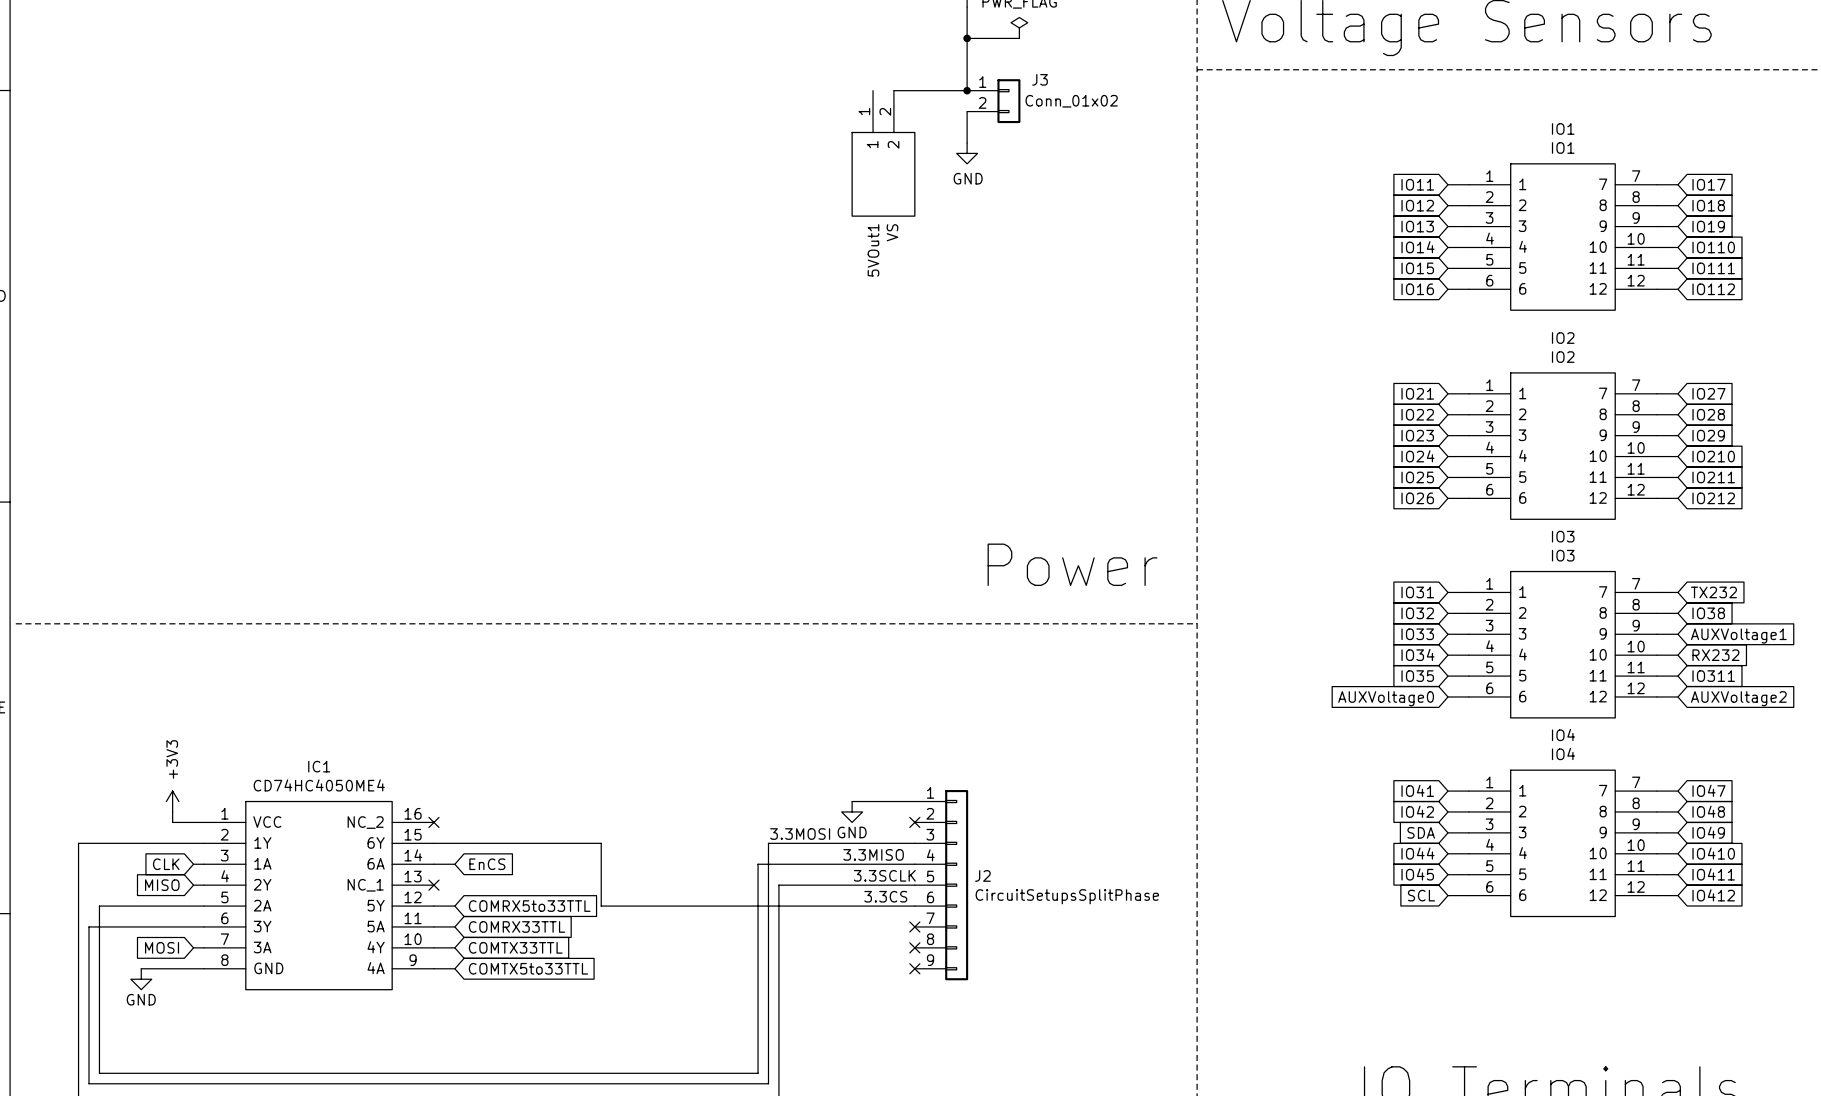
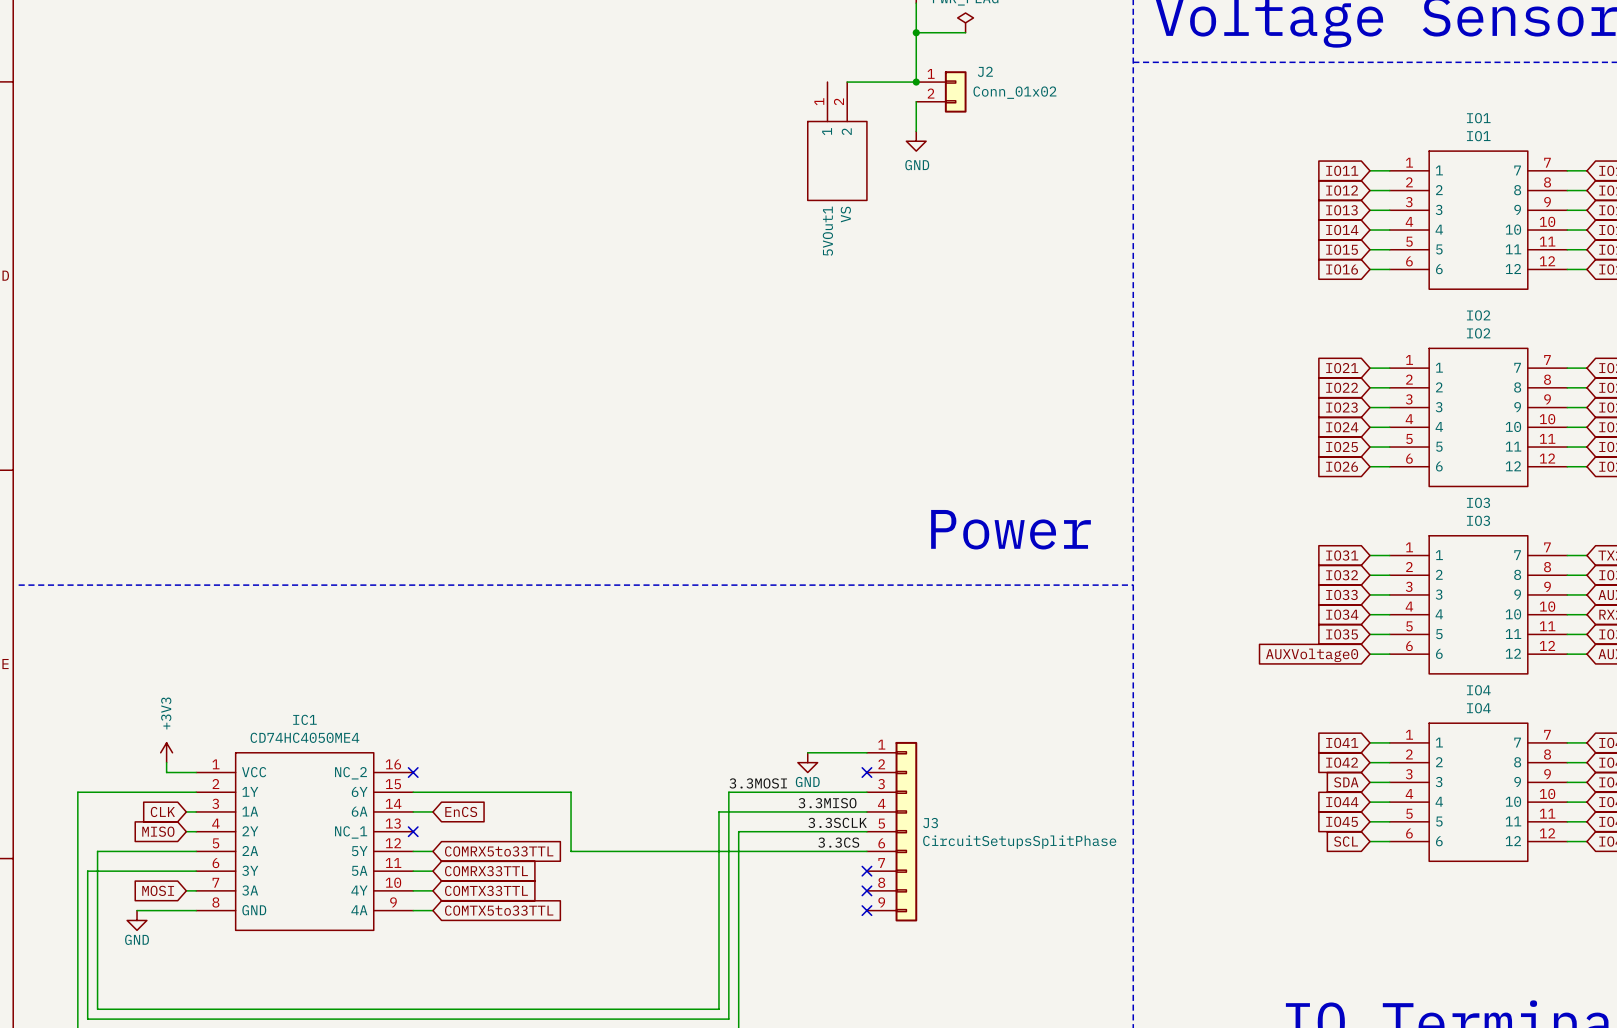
J3 name: J3 (1040, 79) -> J2 (985, 71)
J2 name: J2 (982, 875) -> J3 (930, 823)

